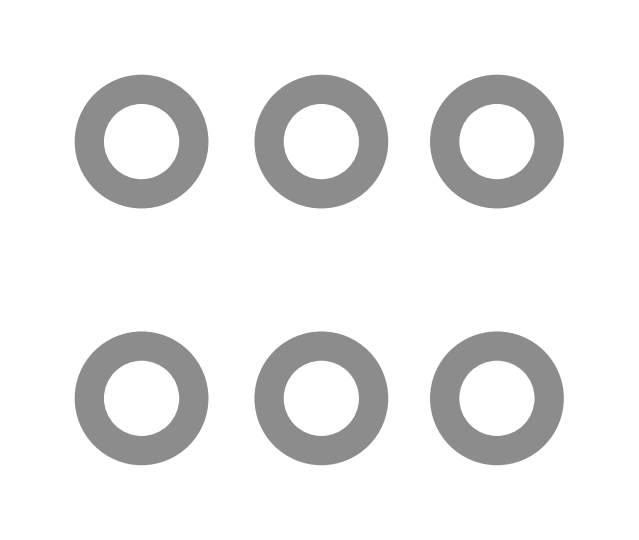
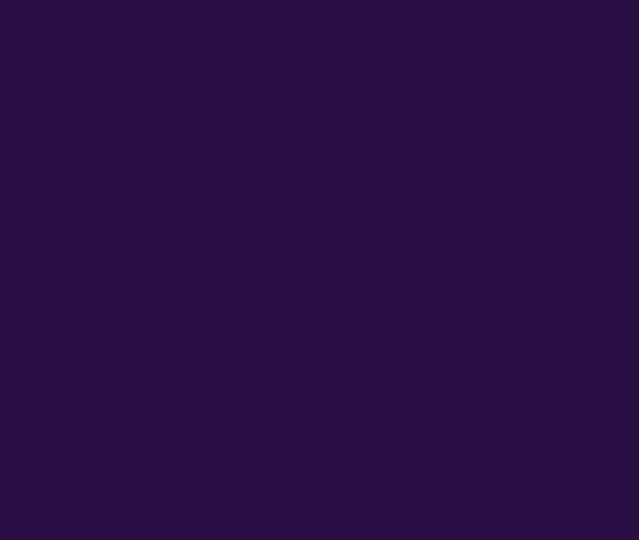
part: (319, 141) -> none
part: (319, 398) -> none

